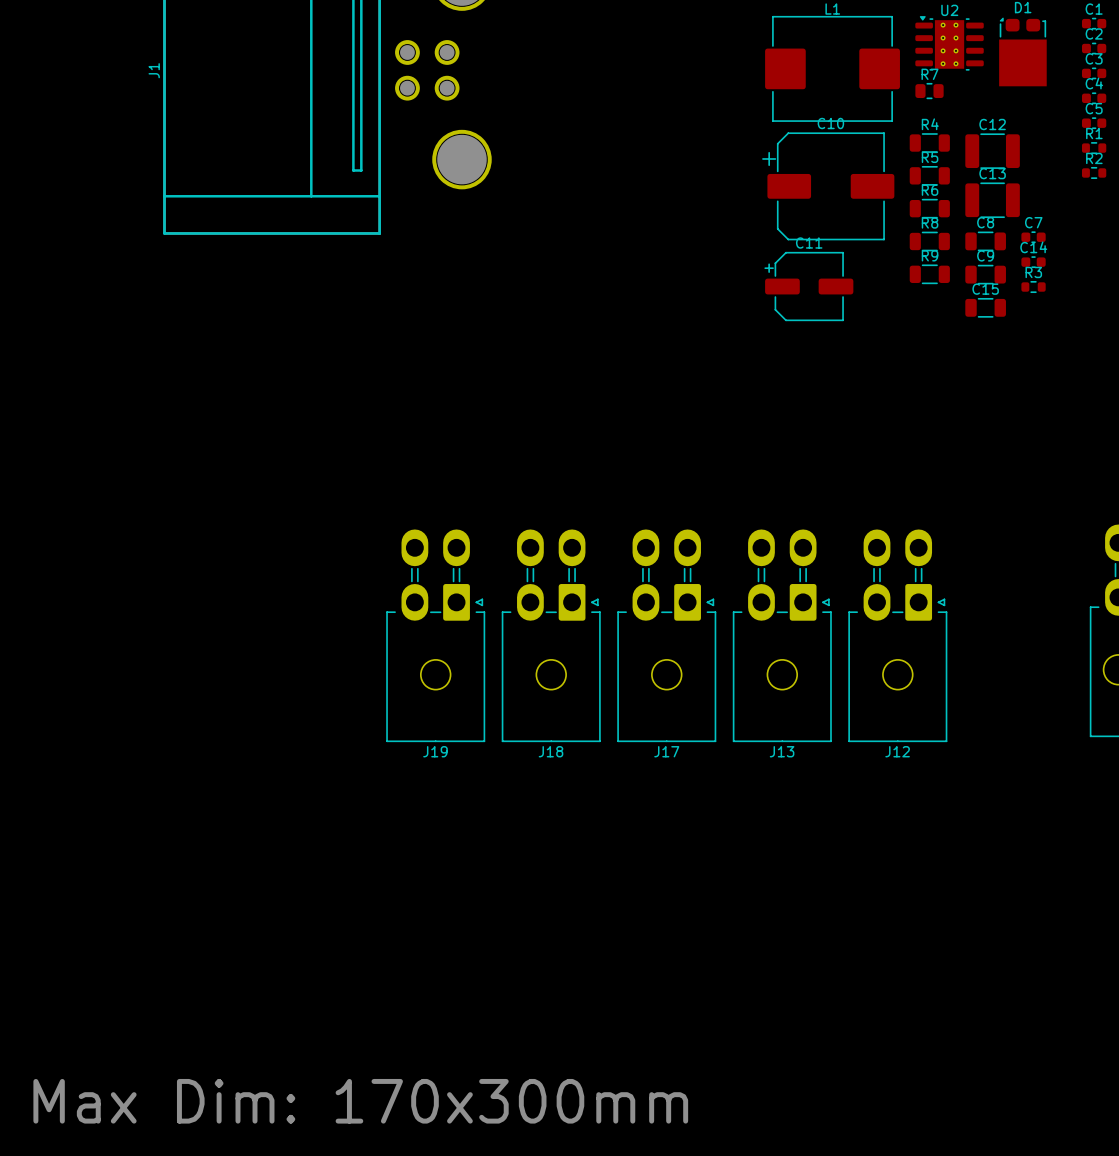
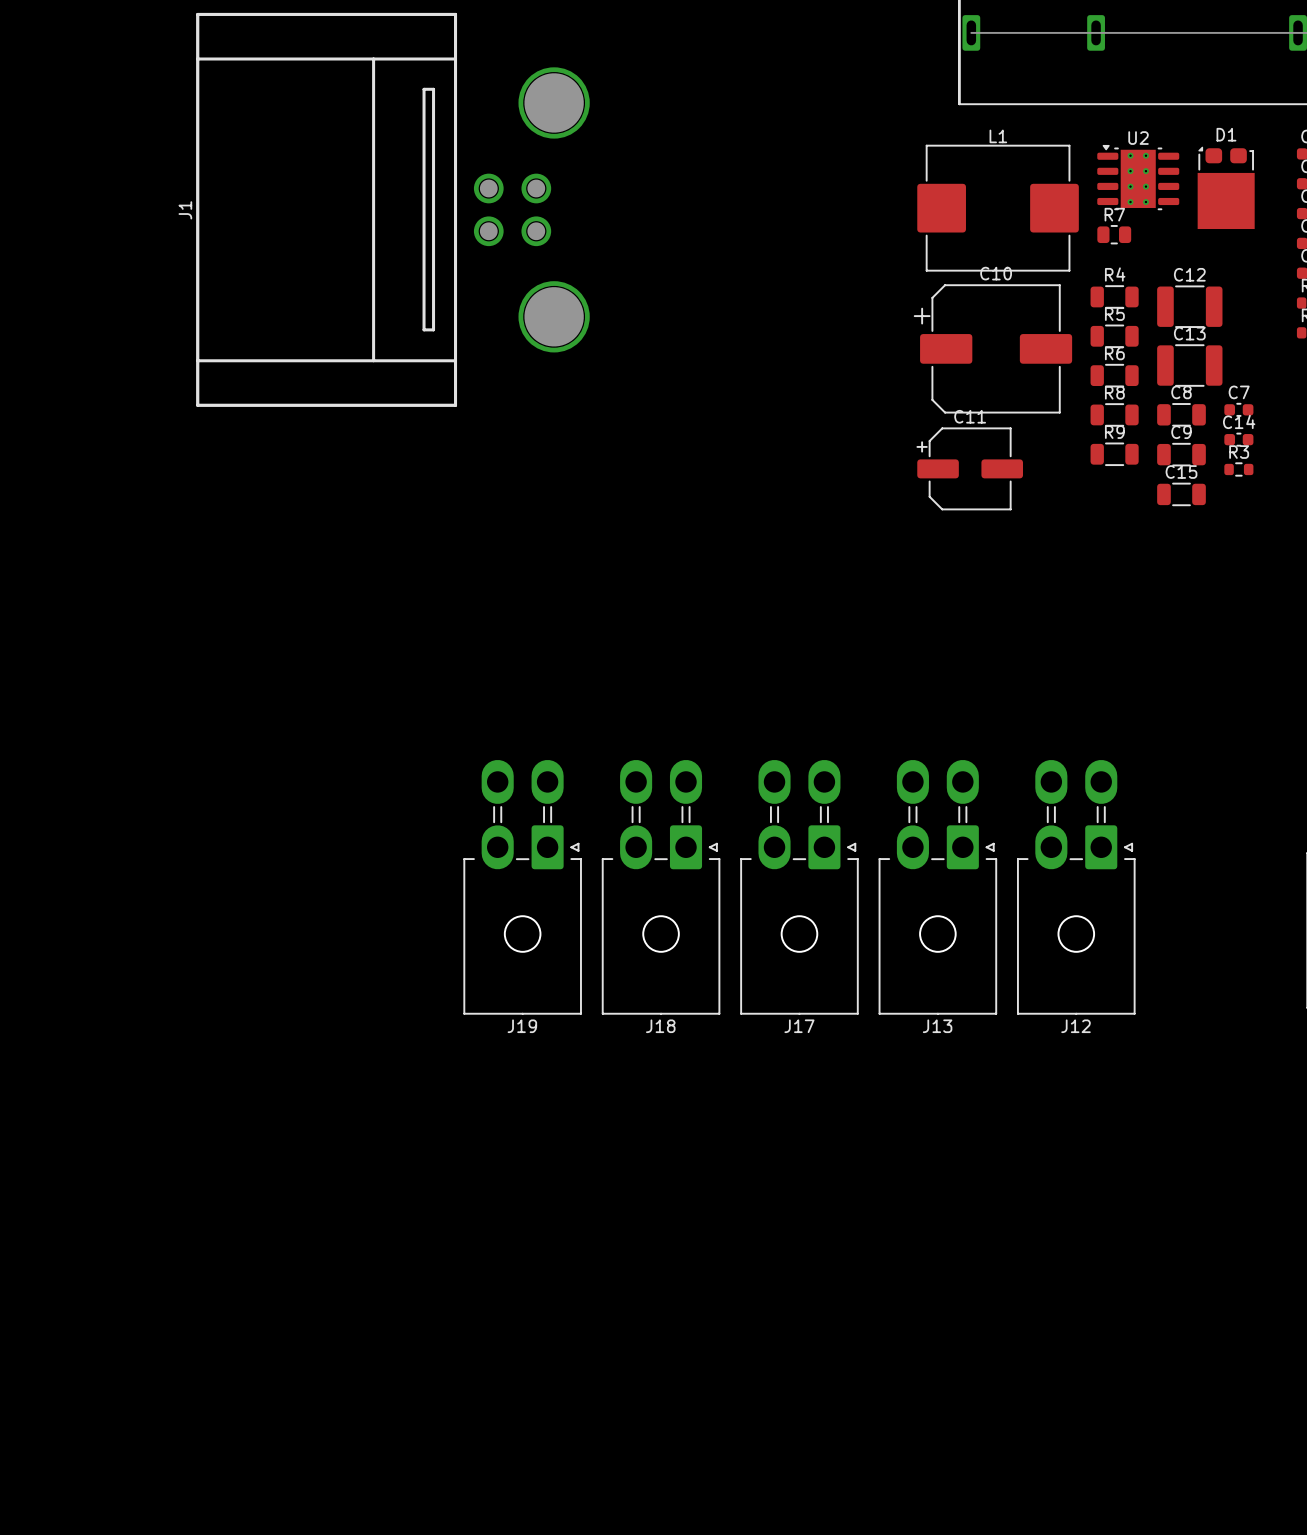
text: Max Dim: 170x300mm (360, 1101) -> none

